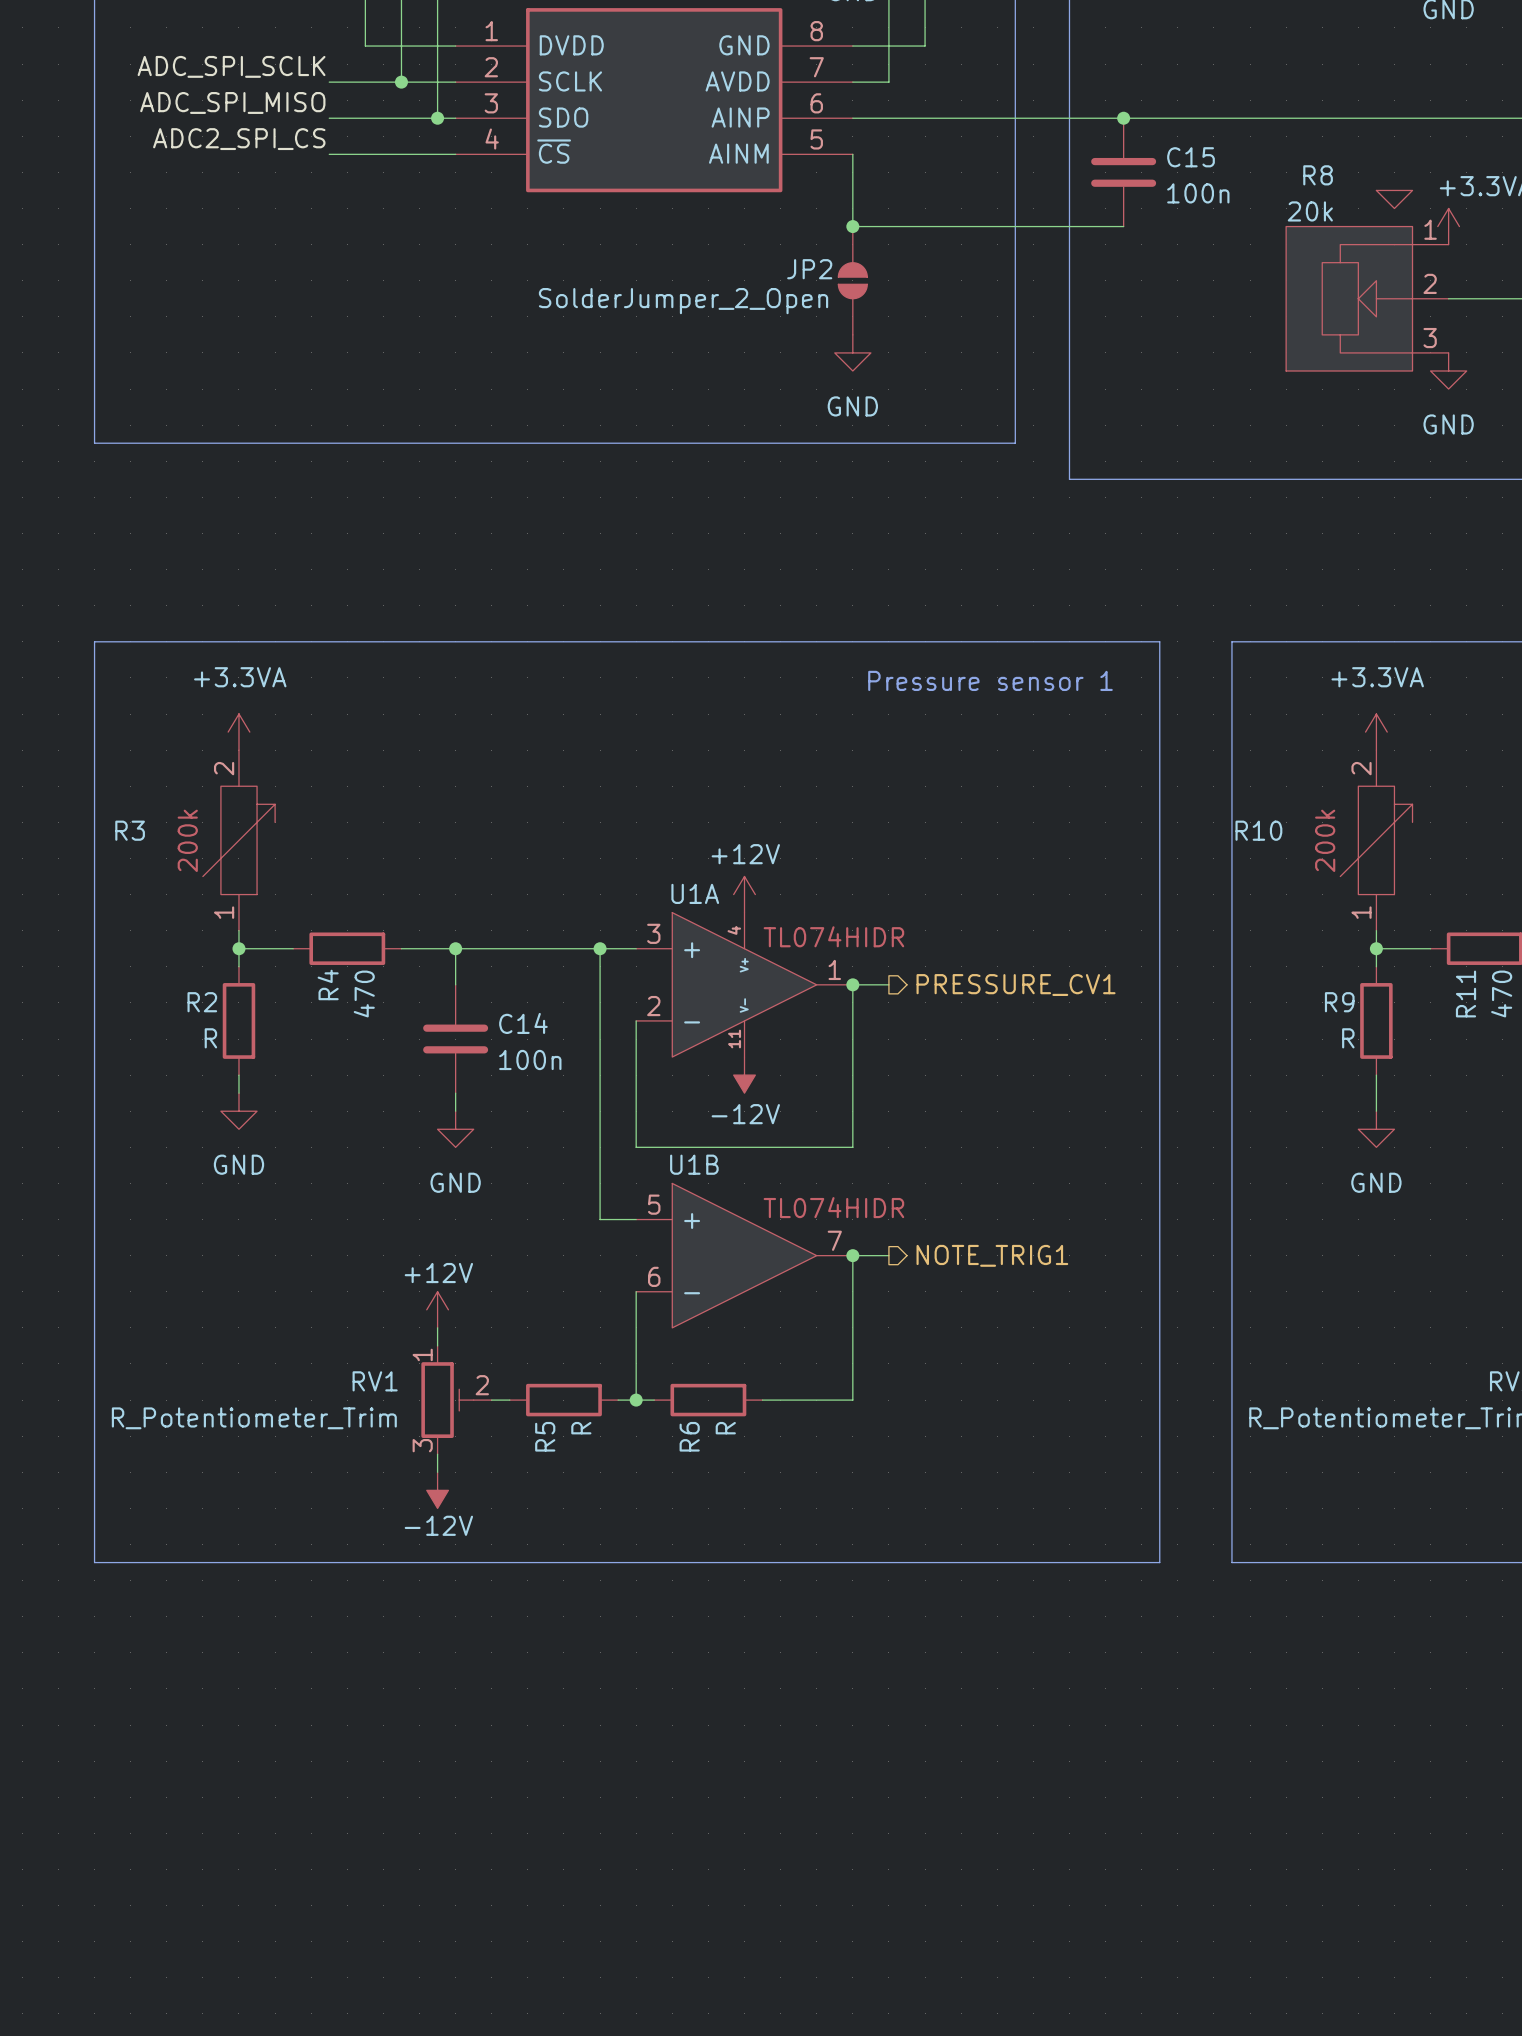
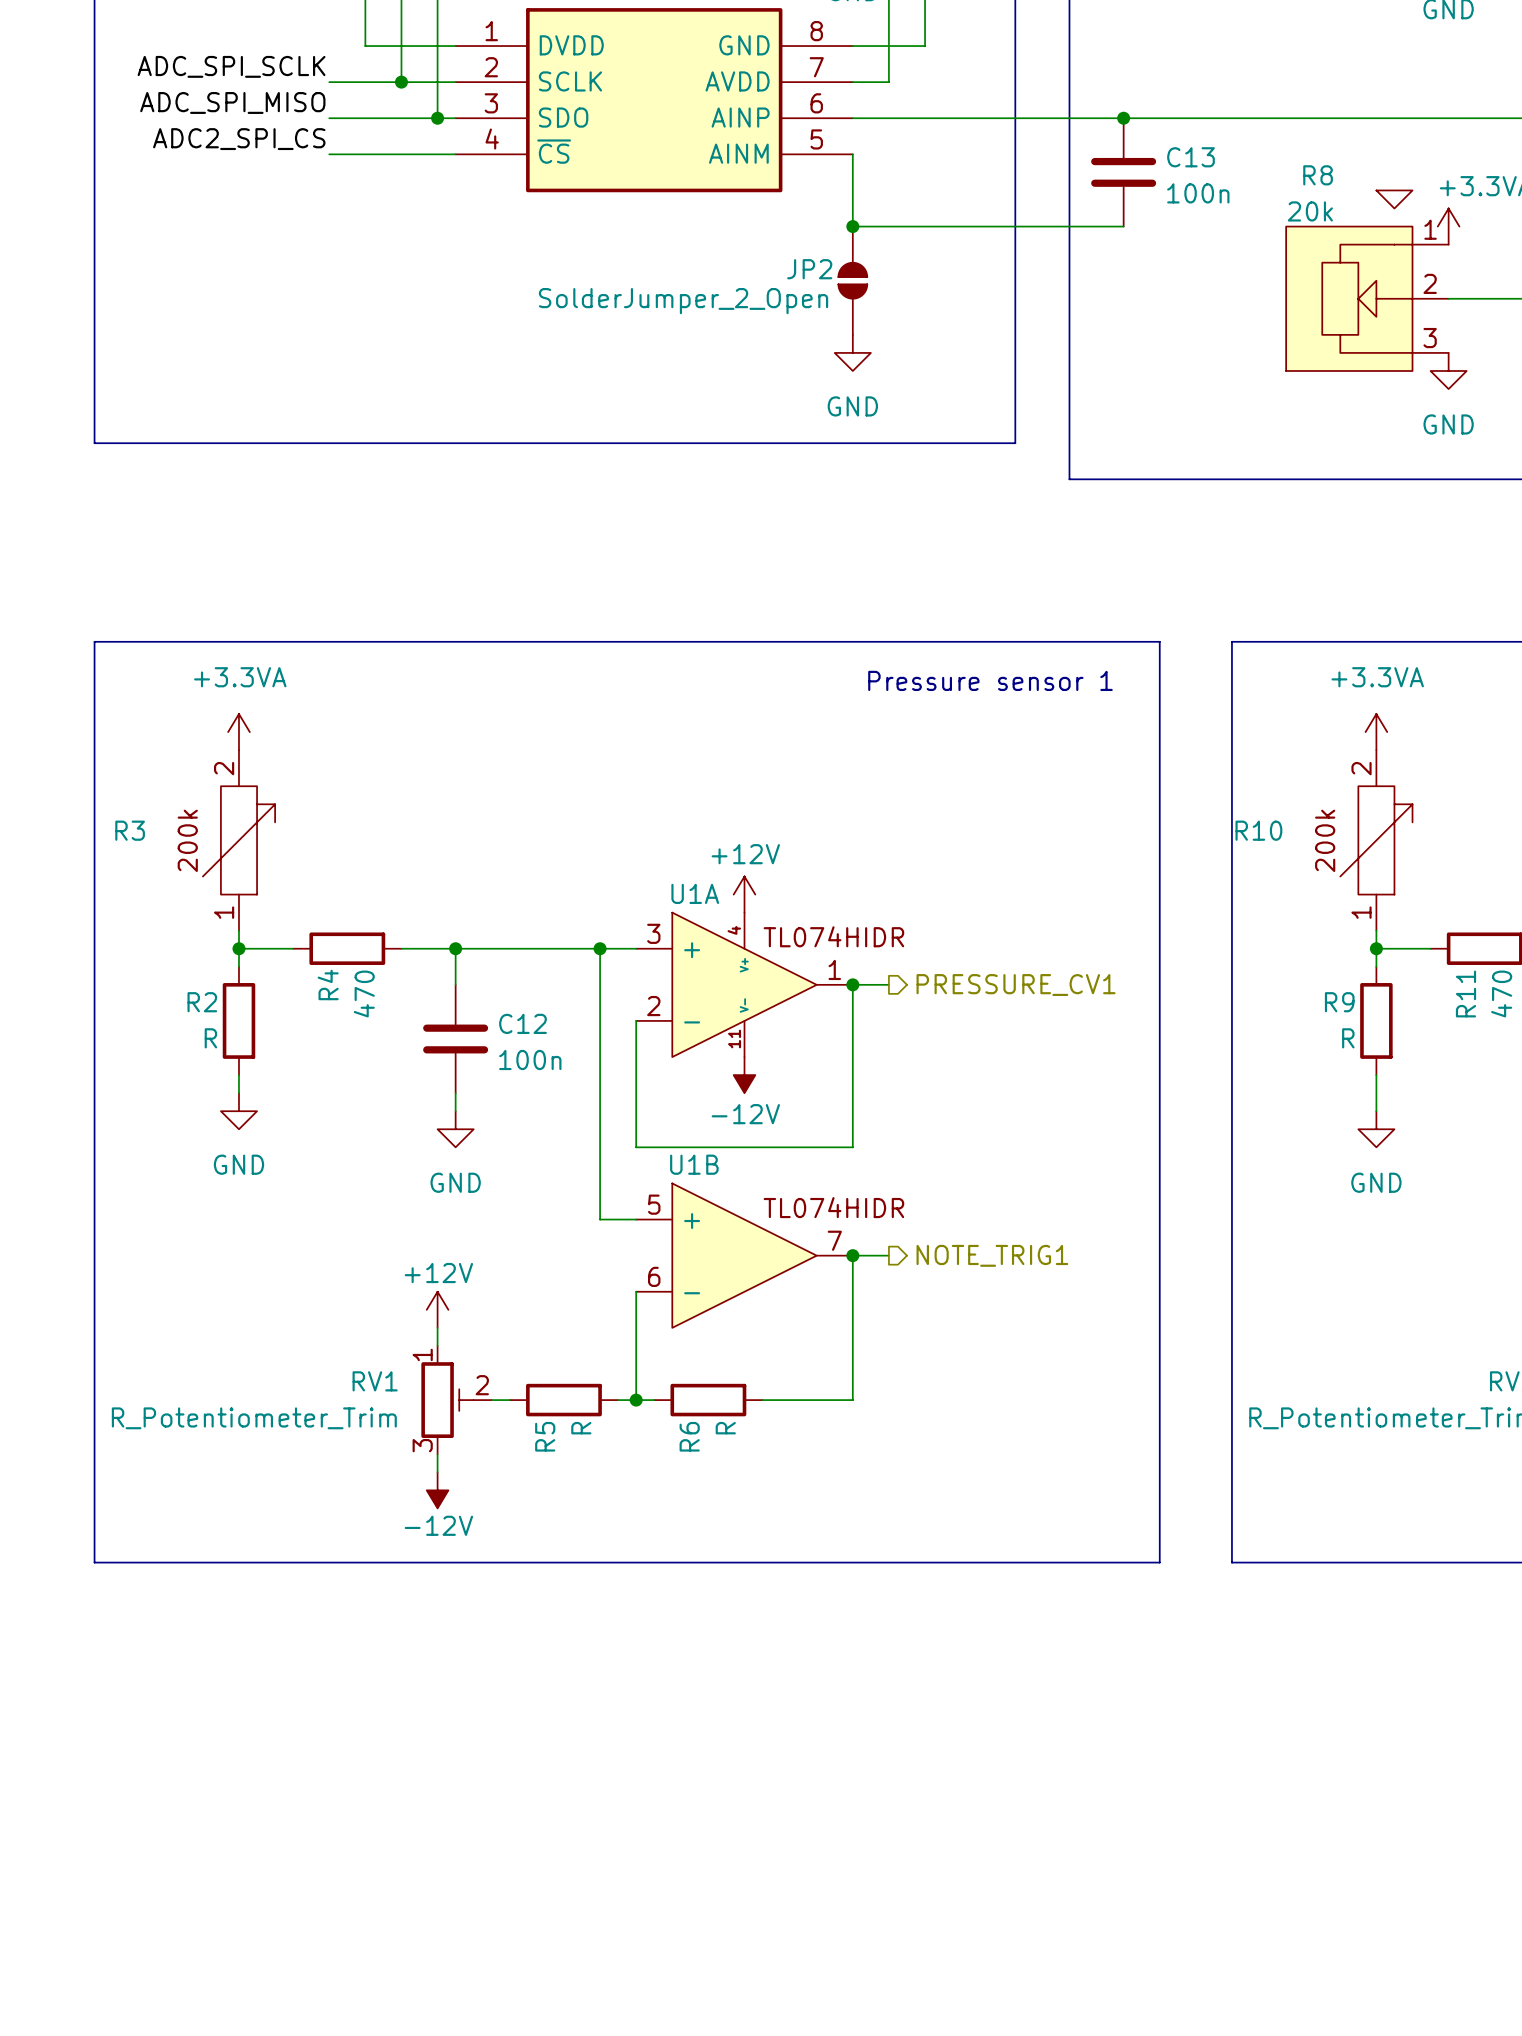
C15 name: C15 (1191, 157) -> C13 (1191, 157)
C14 name: C14 (523, 1023) -> C12 (523, 1023)

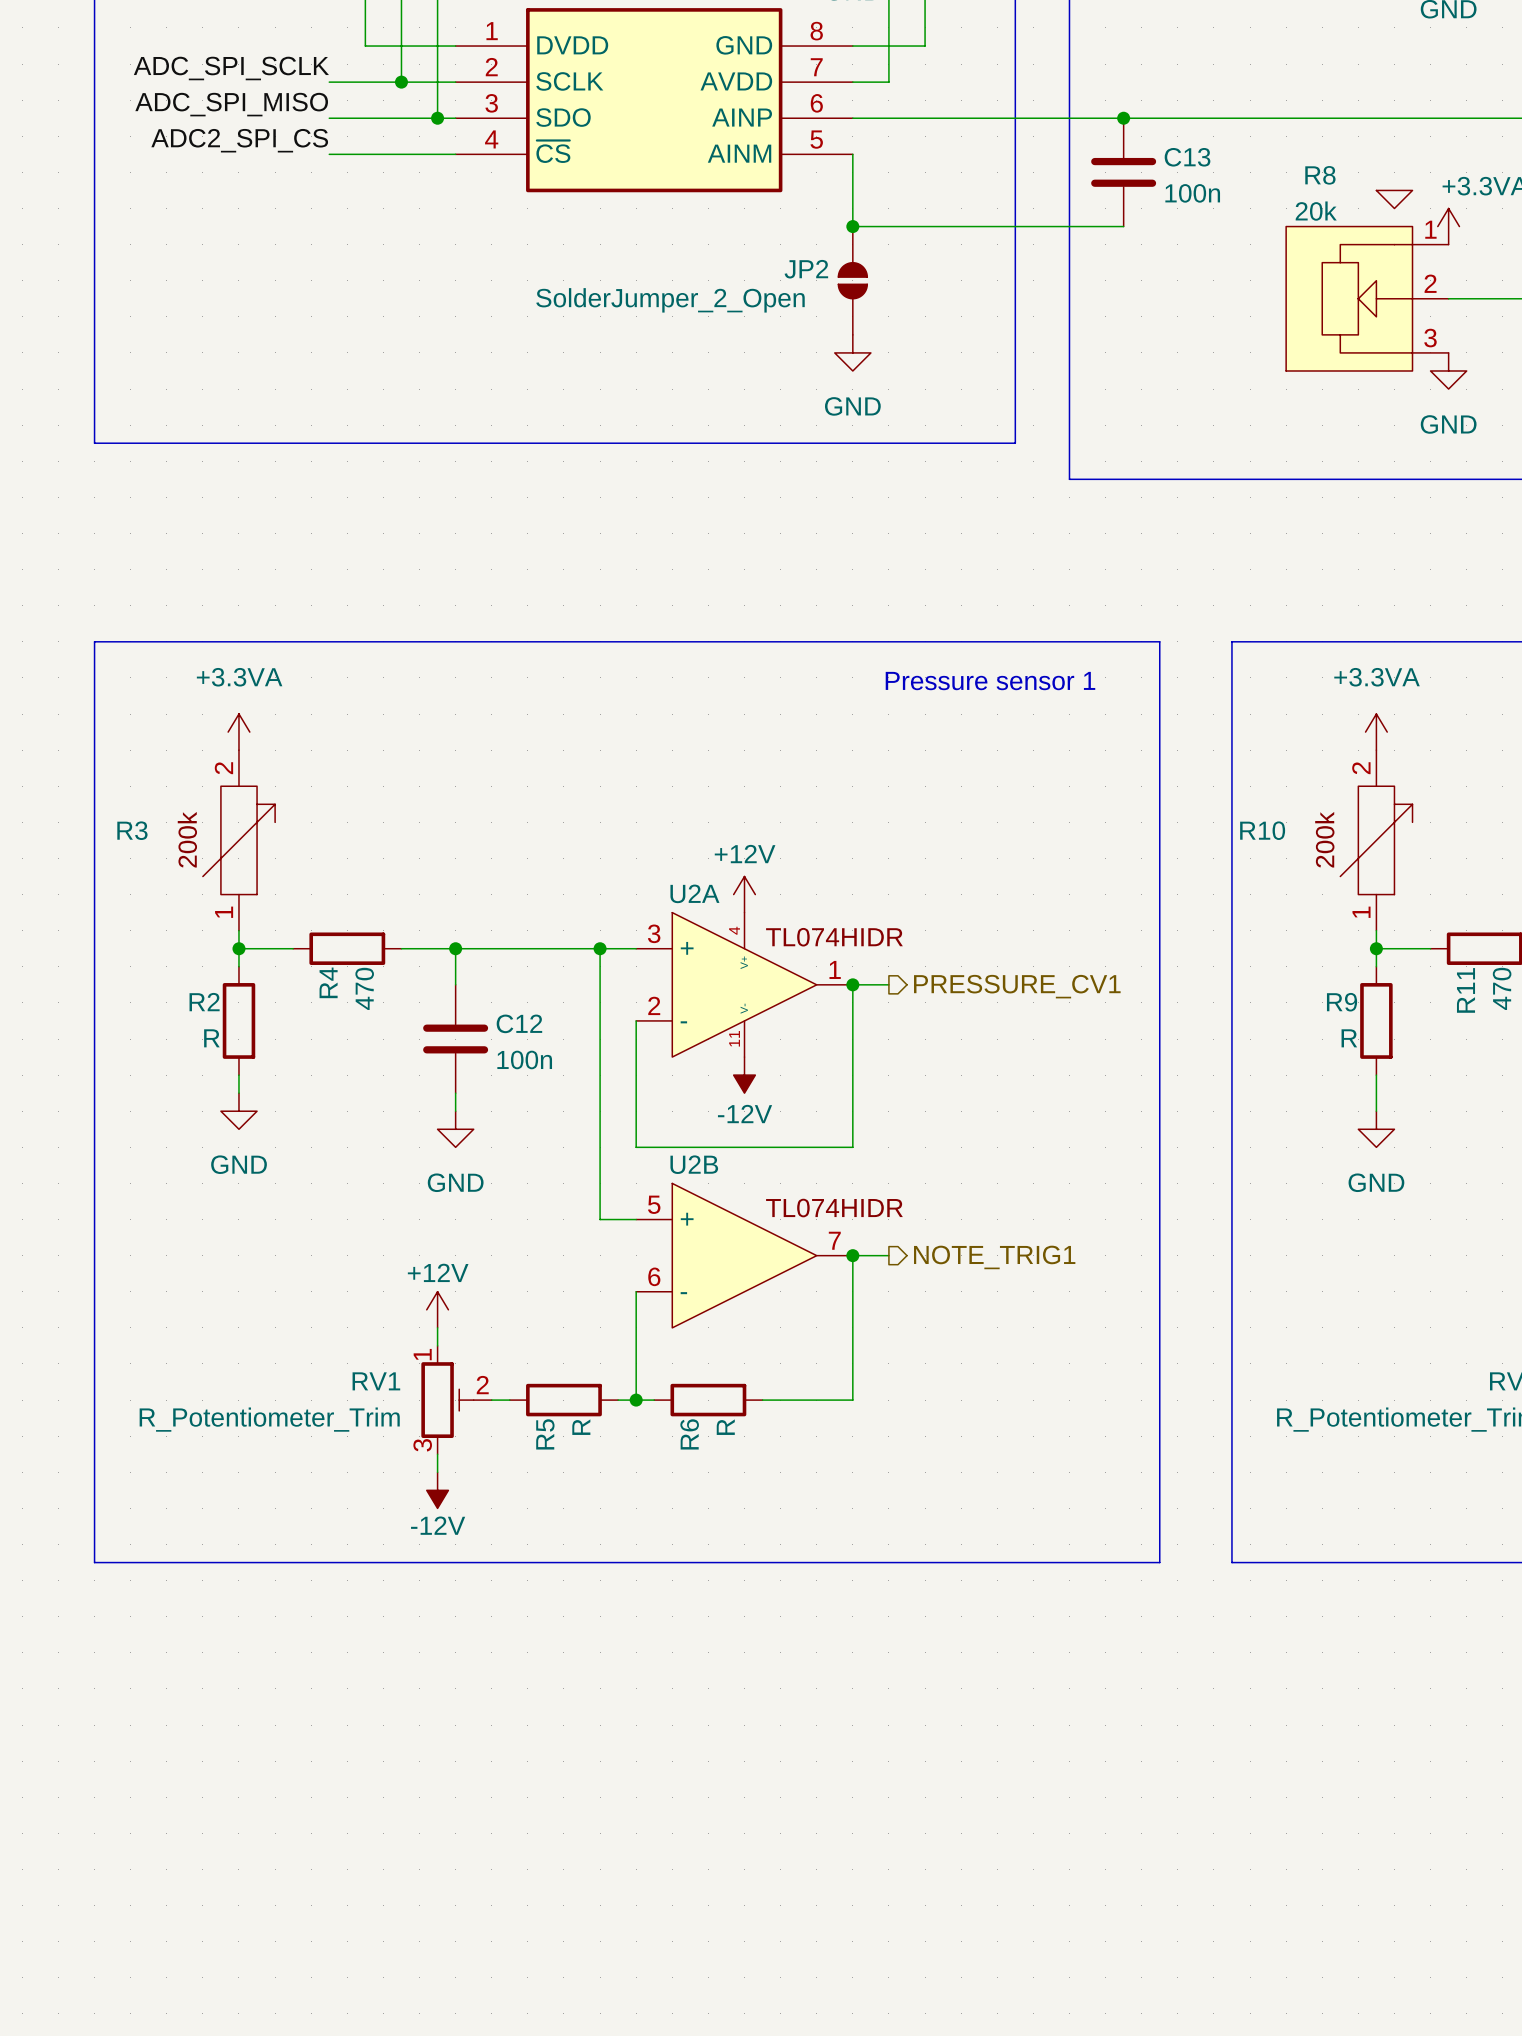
U1A name: U1A (695, 893) -> U2A (694, 893)
U1B name: U1B (694, 1164) -> U2B (694, 1164)

